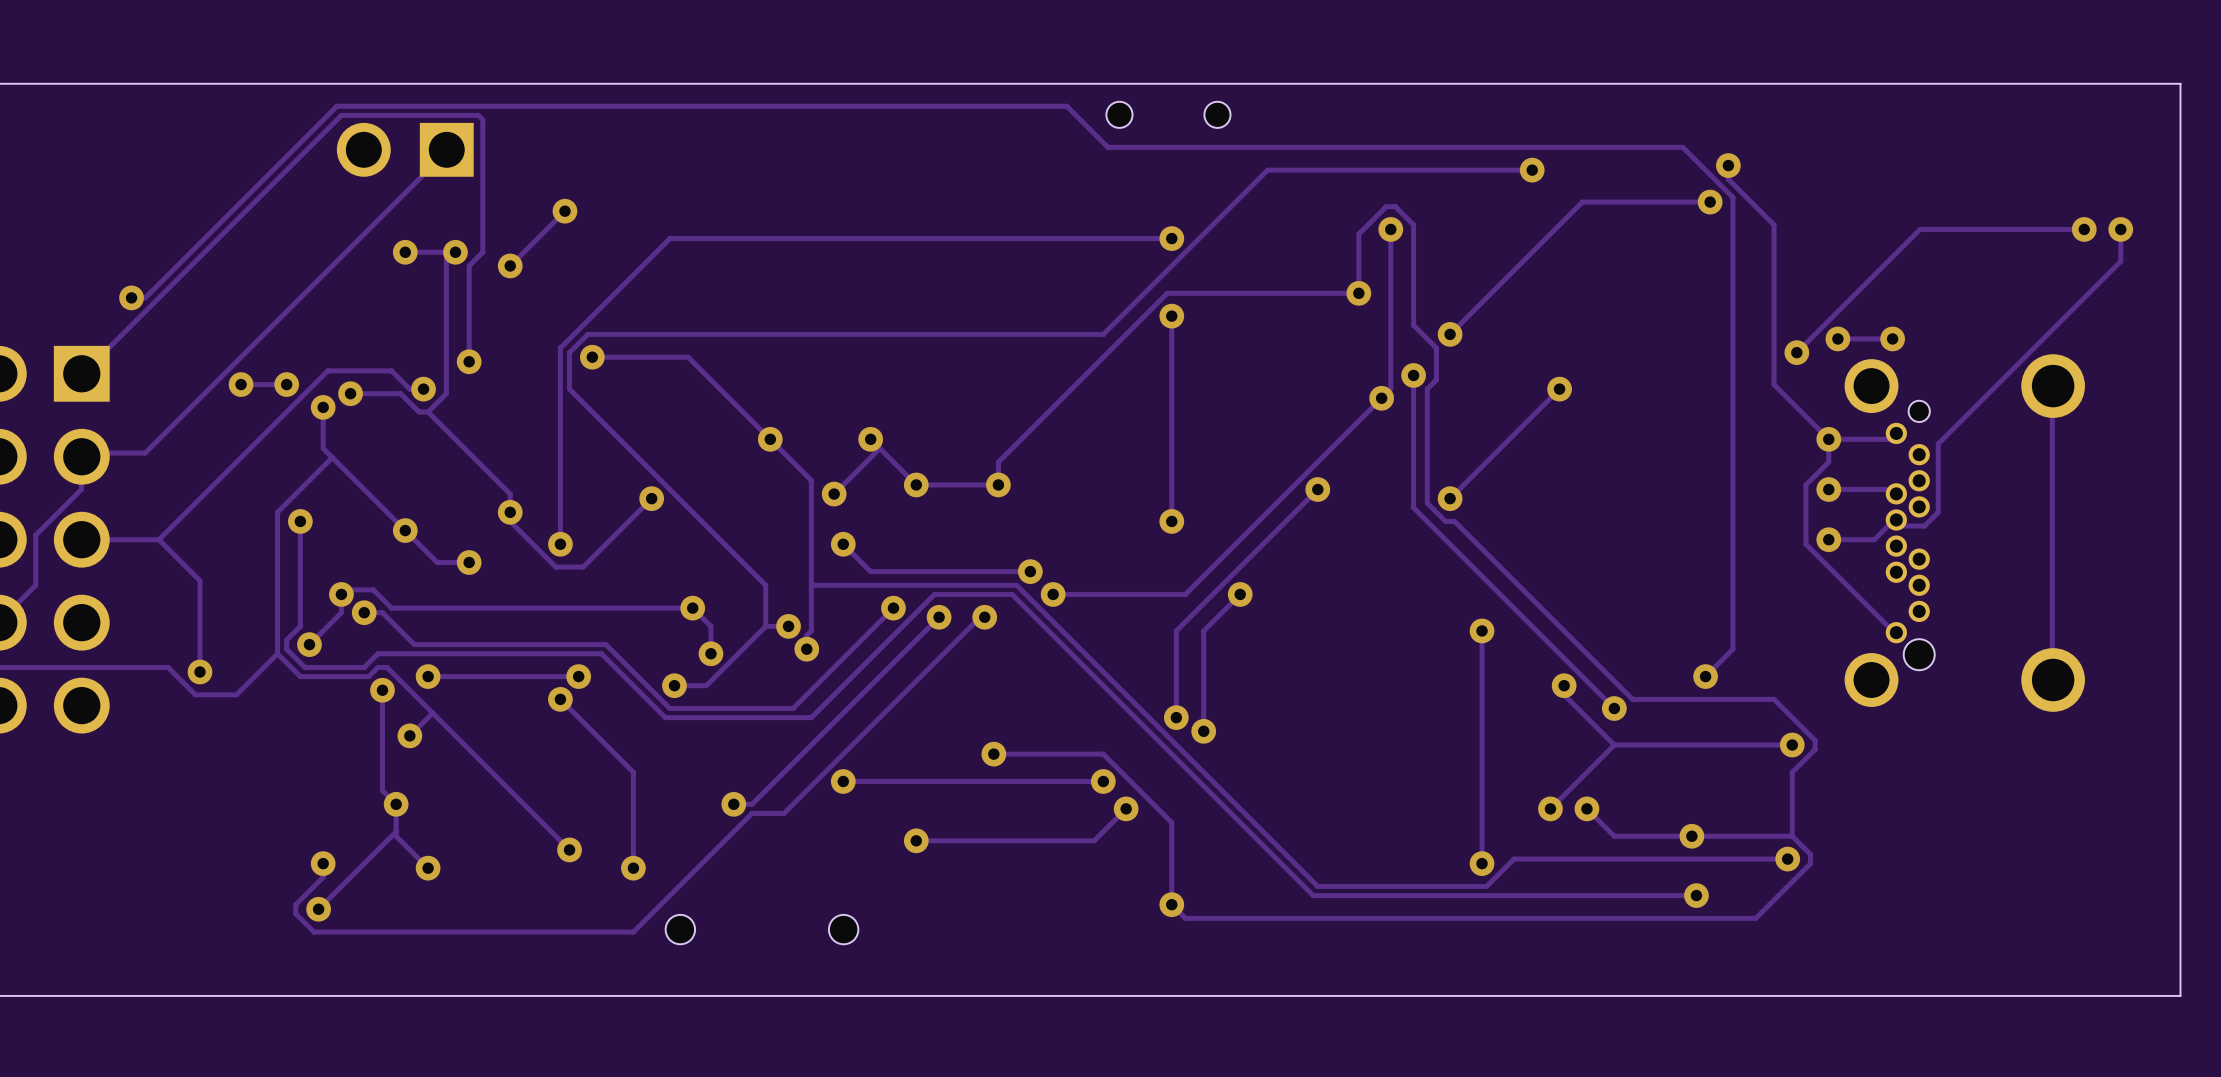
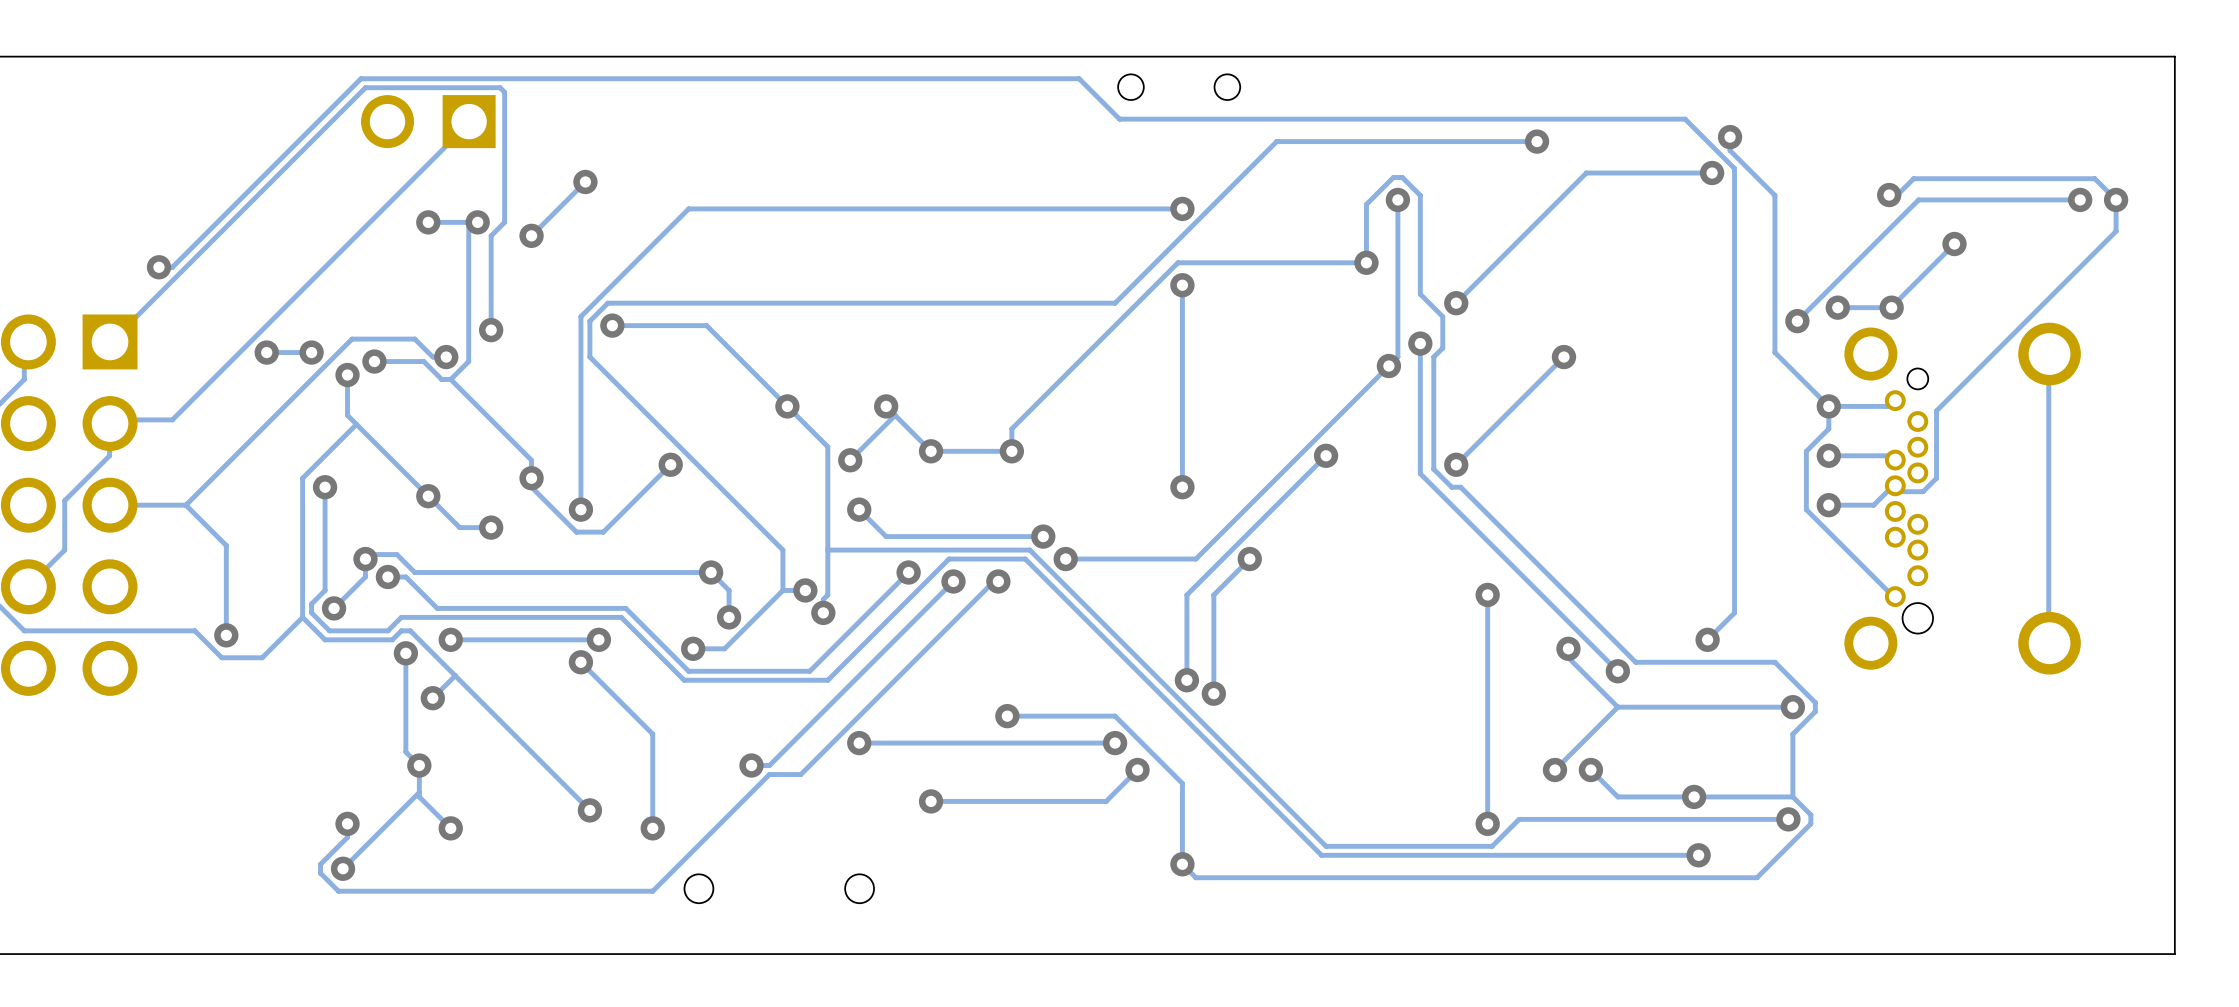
track: none -> (1889, 195) (1897, 195) (1913, 178) (2094, 178) (2116, 199)
via: none -> (1889, 195)
track: none -> (1954, 244) (1891, 307)
via: none -> (1954, 244)

